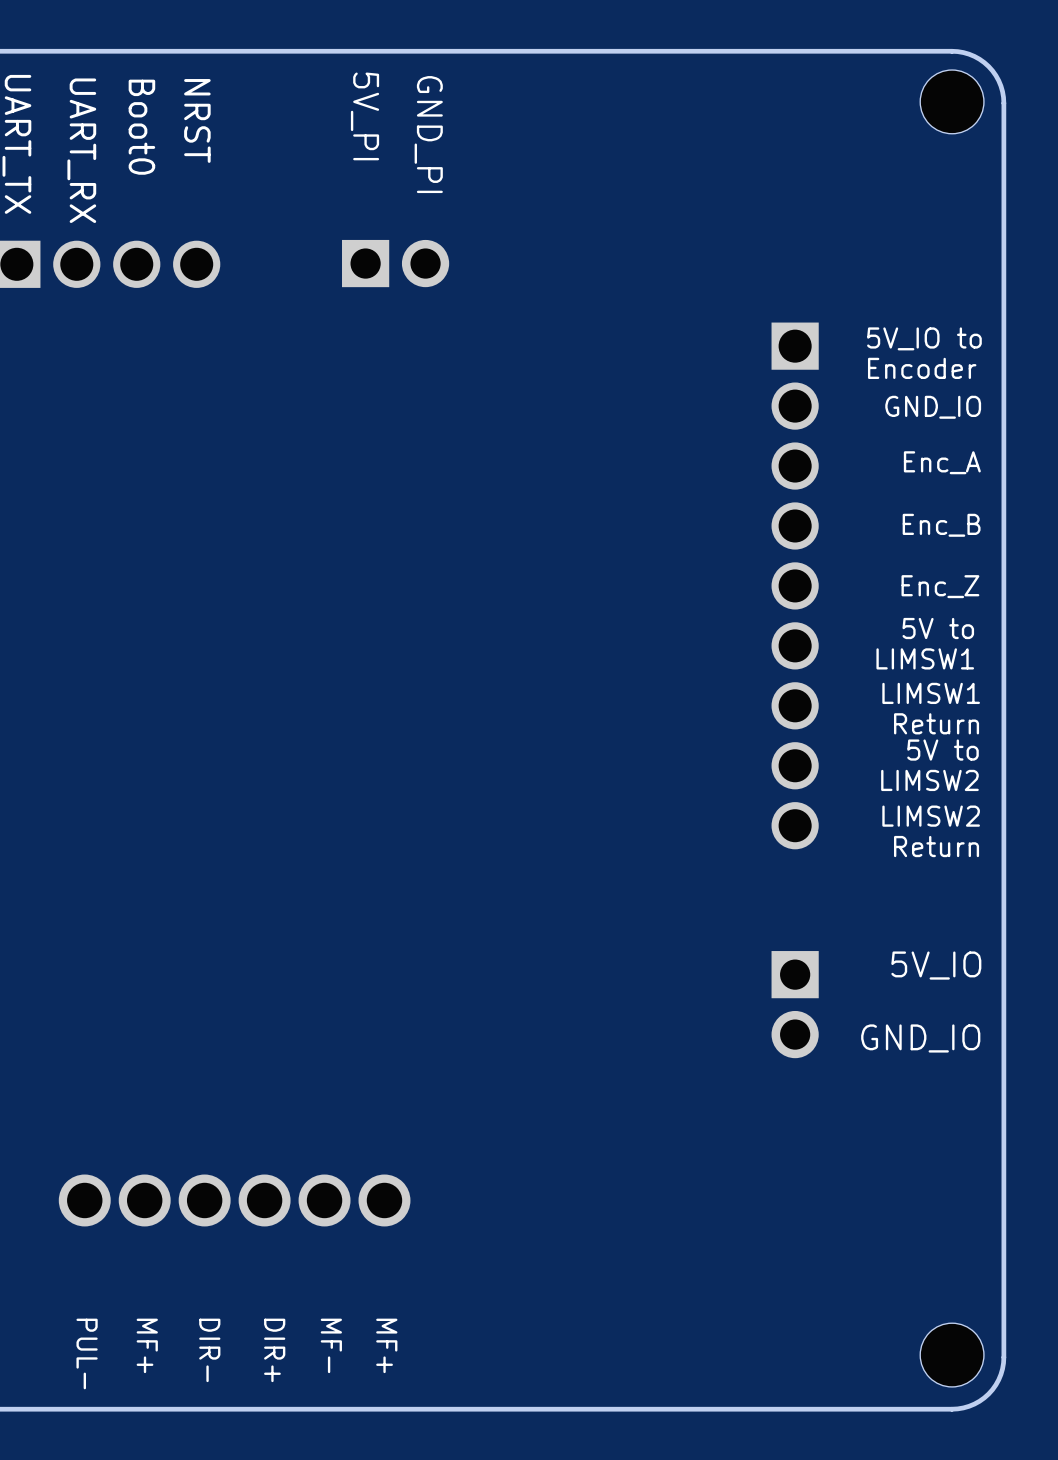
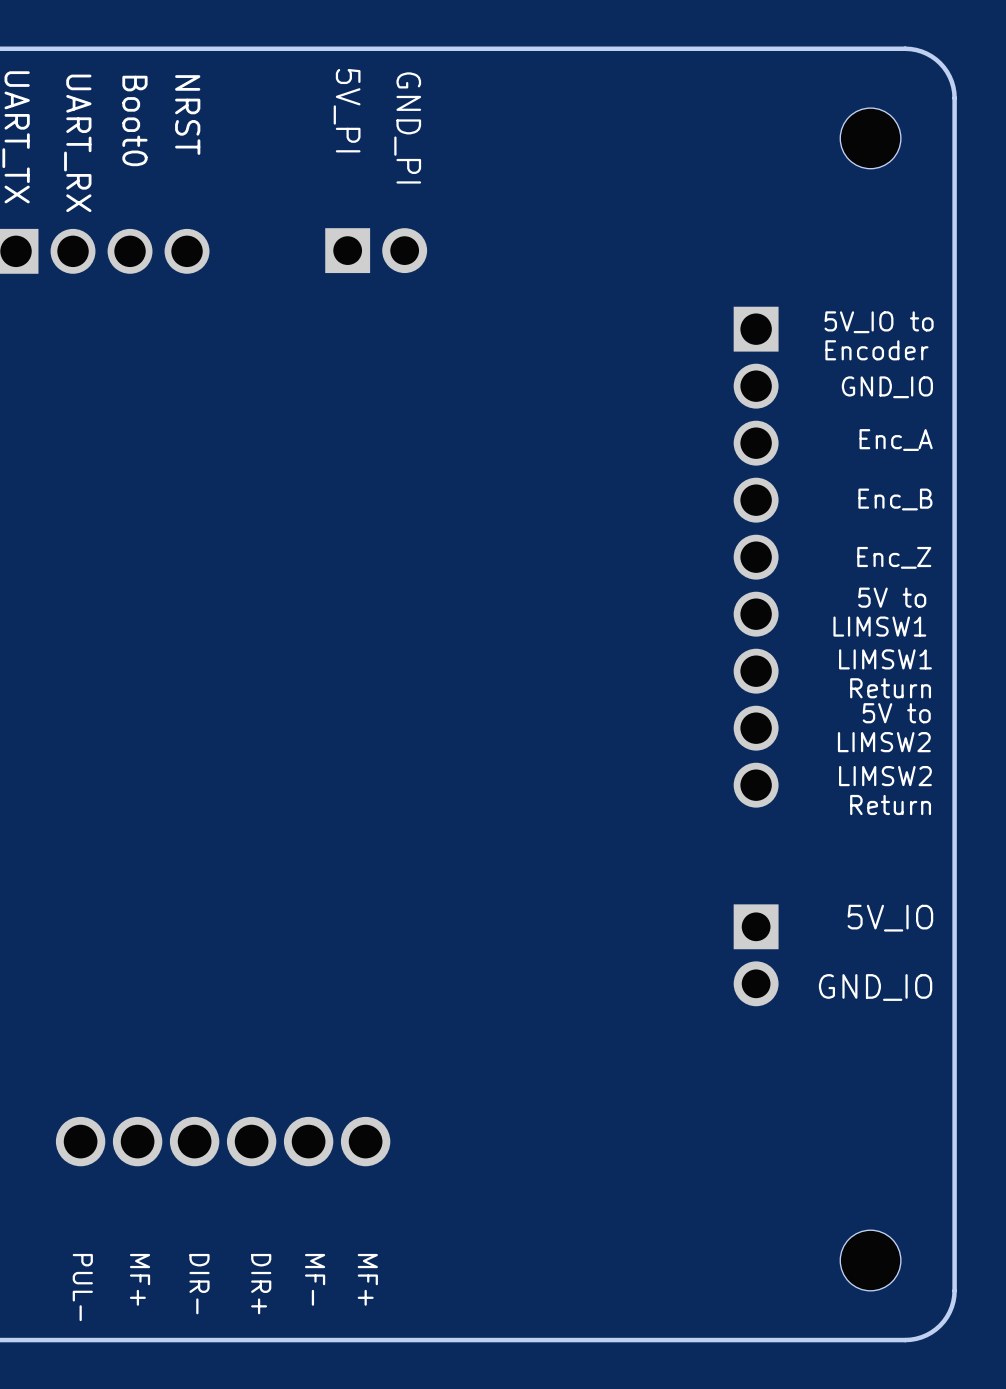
part position: (952, 101) -> (870, 138)
part position: (952, 1355) -> (870, 1260)

